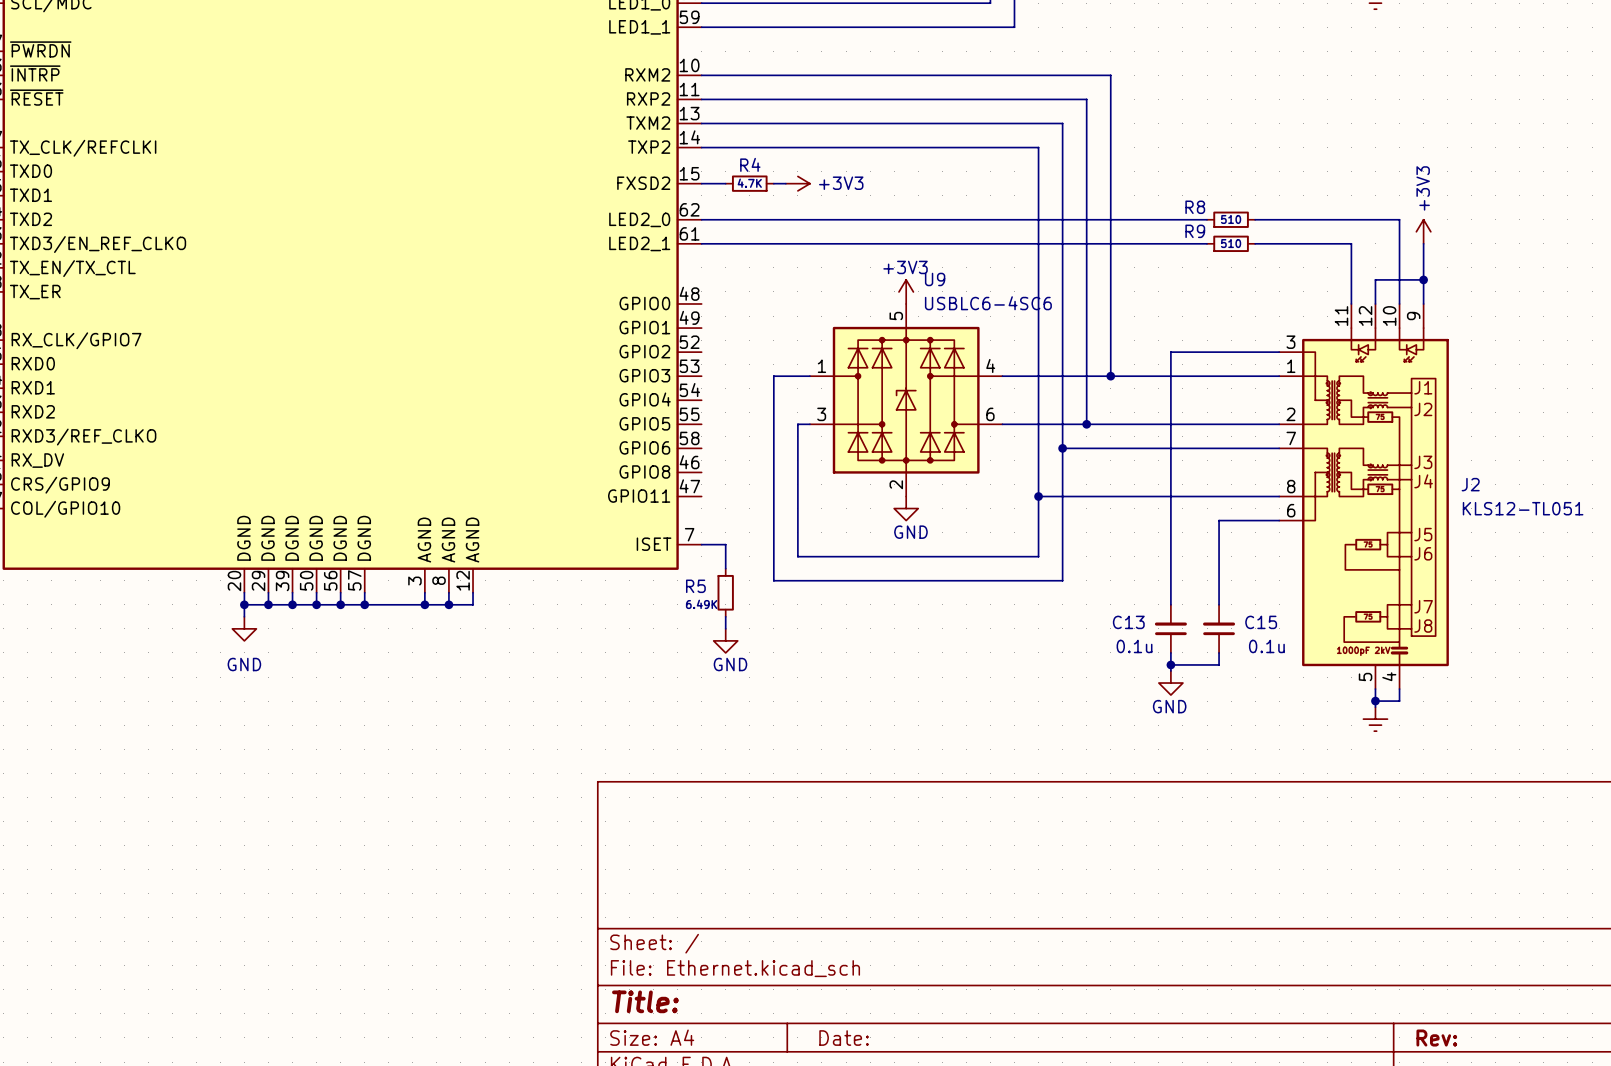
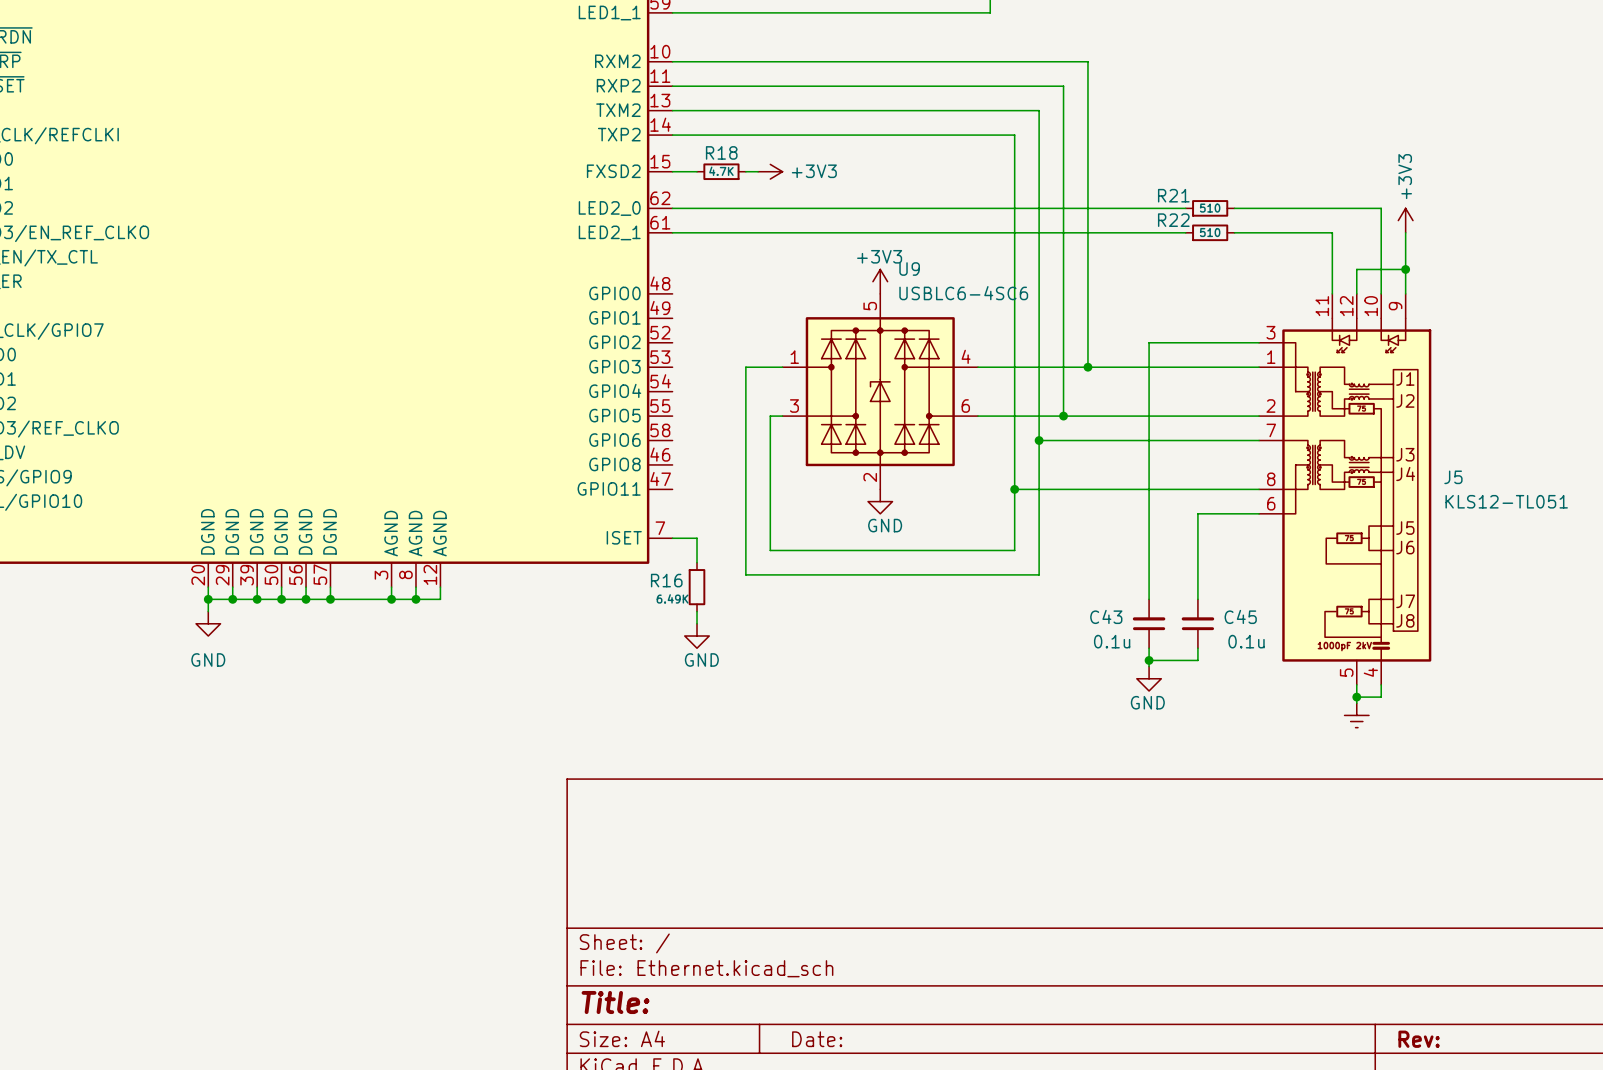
R4 name: R4 (750, 164) -> R18 (721, 152)
R8 name: R8 (1195, 207) -> R21 (1173, 195)
R9 name: R9 (1195, 231) -> R22 (1173, 220)
J2 name: J2 (1470, 484) -> J5 (1453, 477)
R5 name: R5 (695, 586) -> R16 (666, 580)
C13 name: C13 (1128, 622) -> C43 (1106, 616)
C15 name: C15 (1261, 622) -> C45 (1240, 616)

